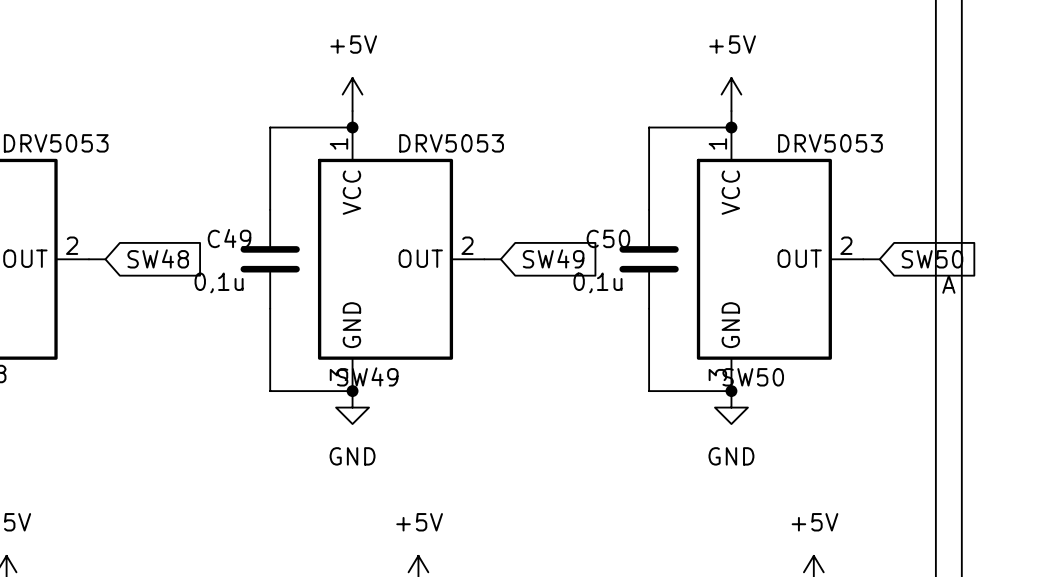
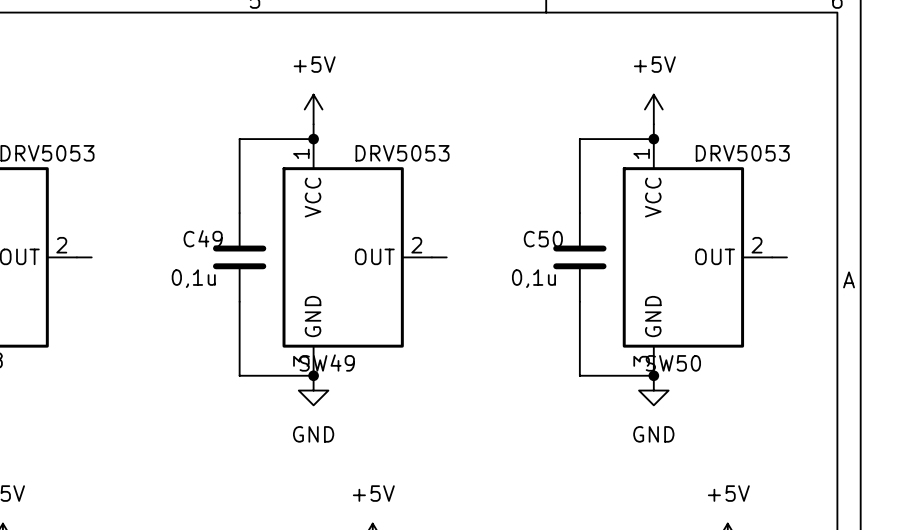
global label: SW48 (158, 258) -> none
global label: SW49 (553, 258) -> none
global label: SW50 (932, 259) -> none

